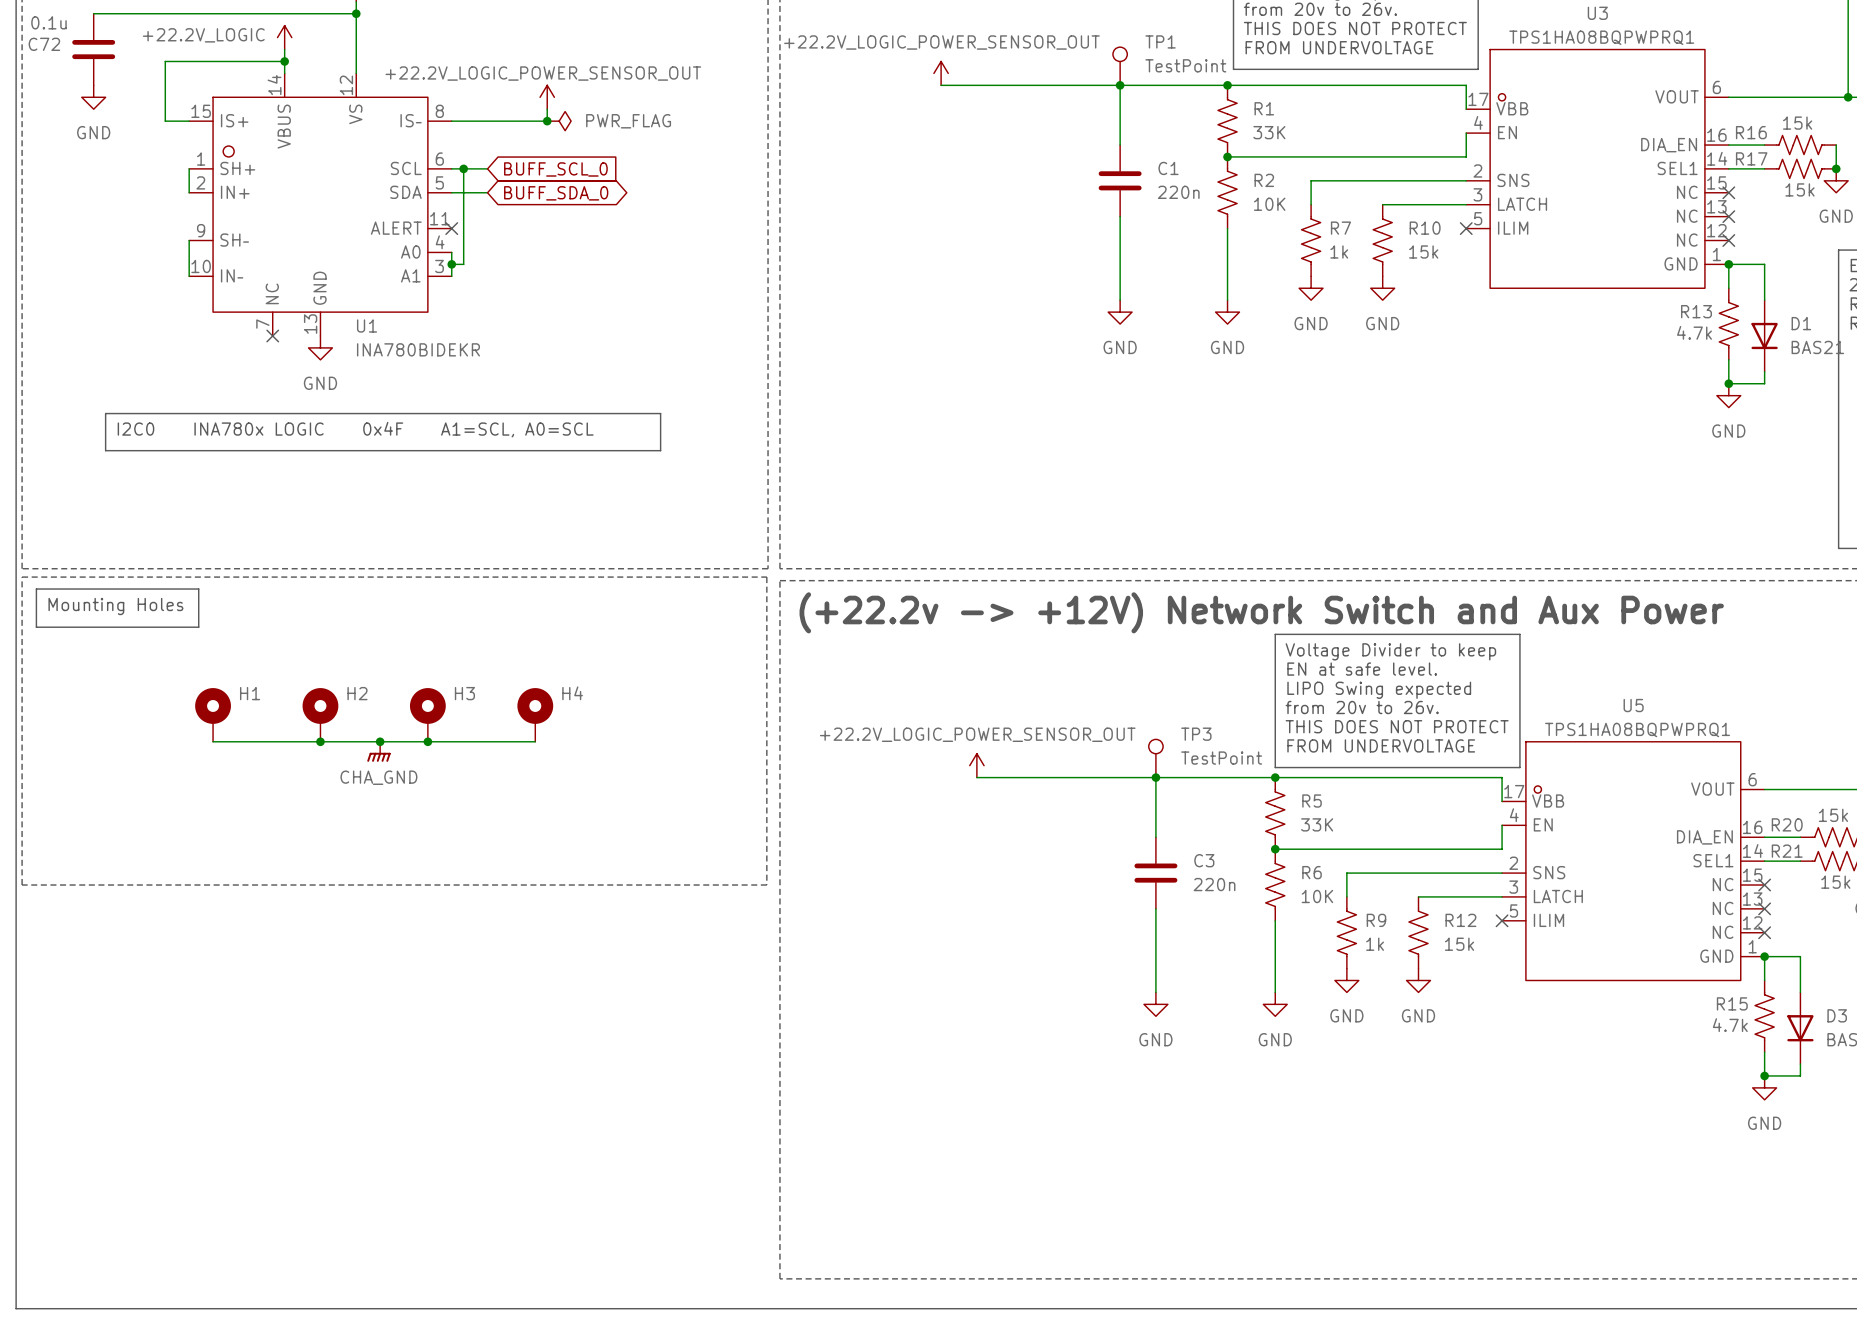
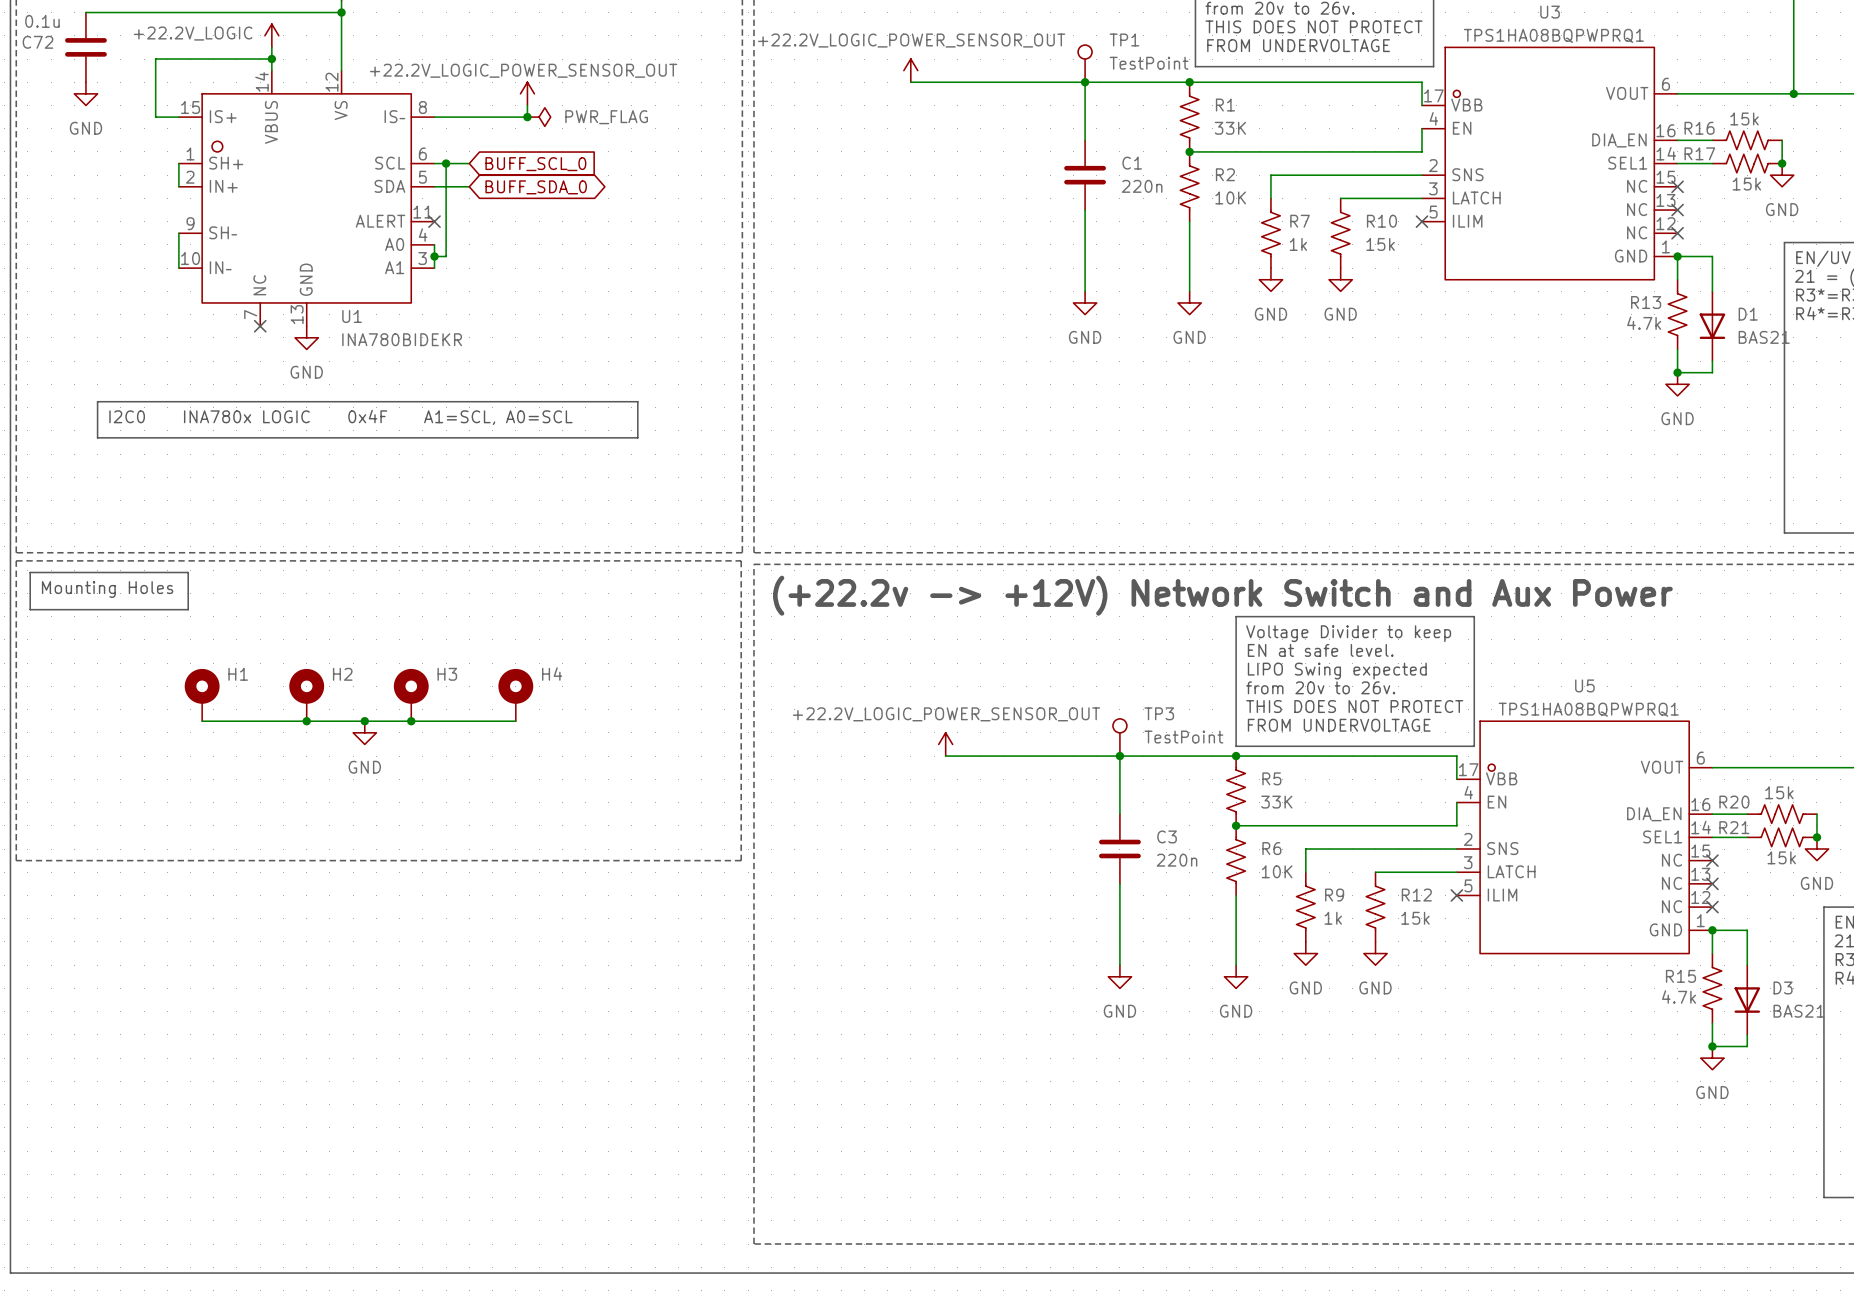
power symbol: CHA_GND (378, 751) -> GND (364, 732)

